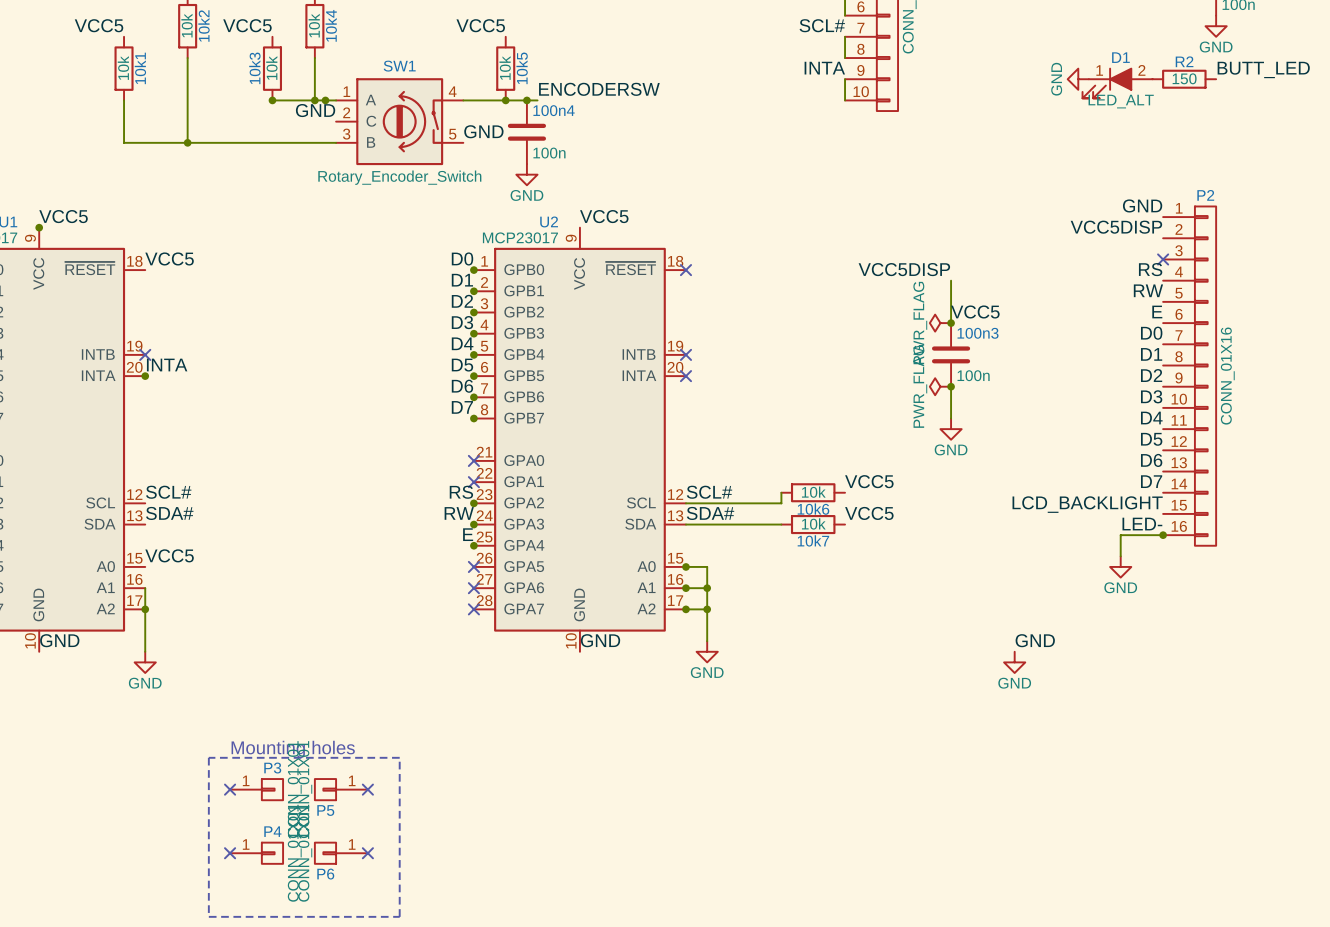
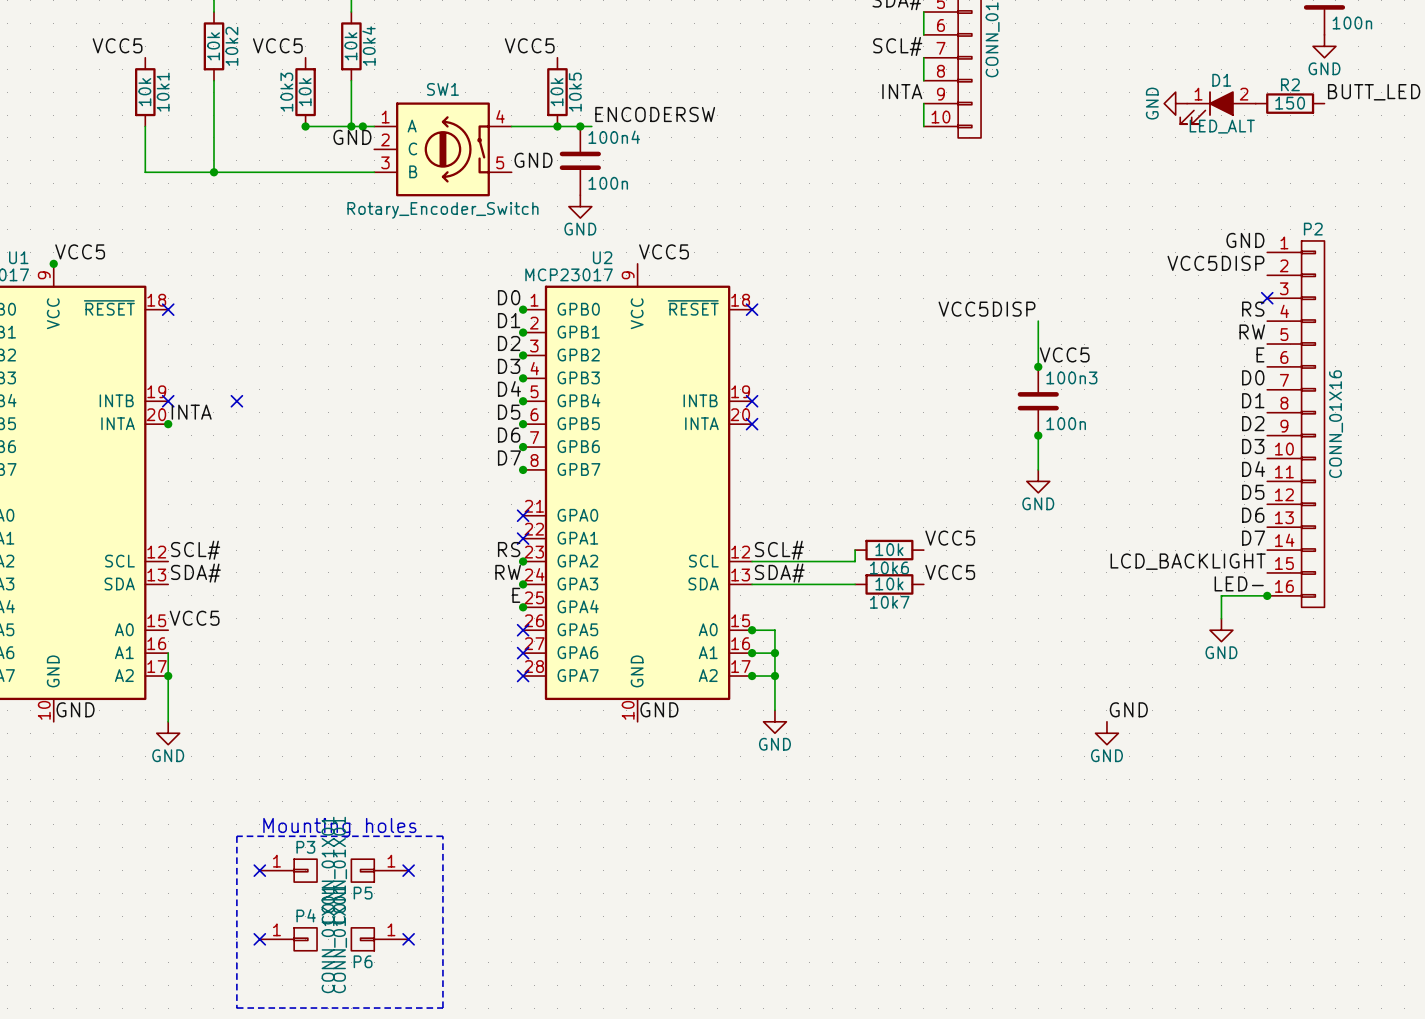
label: VCC5 (169, 258) -> none
no-connect mark: none -> (168, 309)
power symbol: PWR_FLAG (940, 323) -> none
no-connect mark: none -> (236, 401)
power symbol: PWR_FLAG (940, 386) -> none

